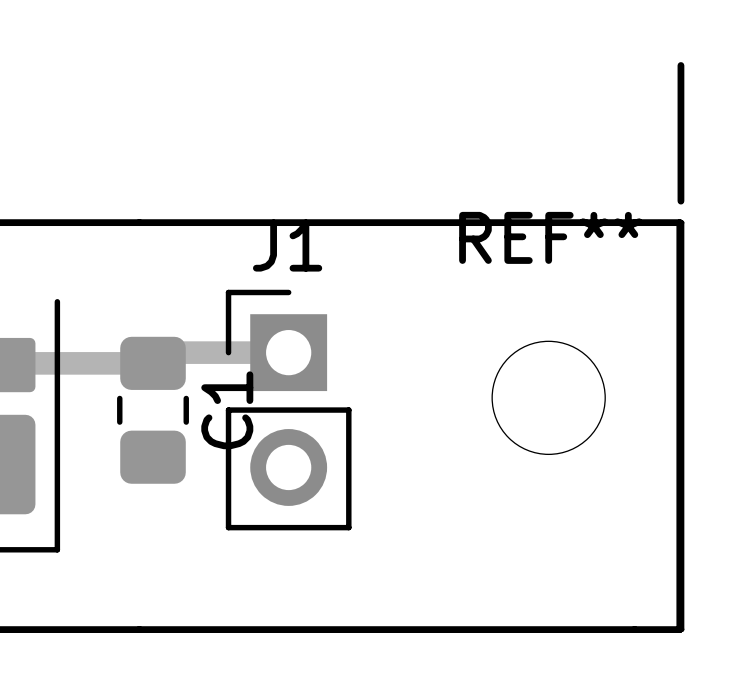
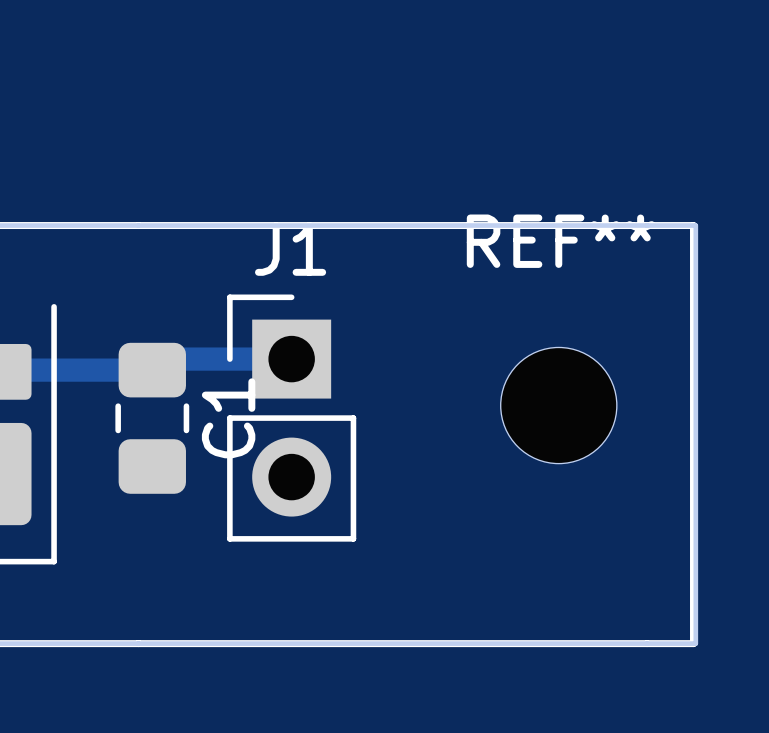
line: (680, 65) (680, 201) -> none

